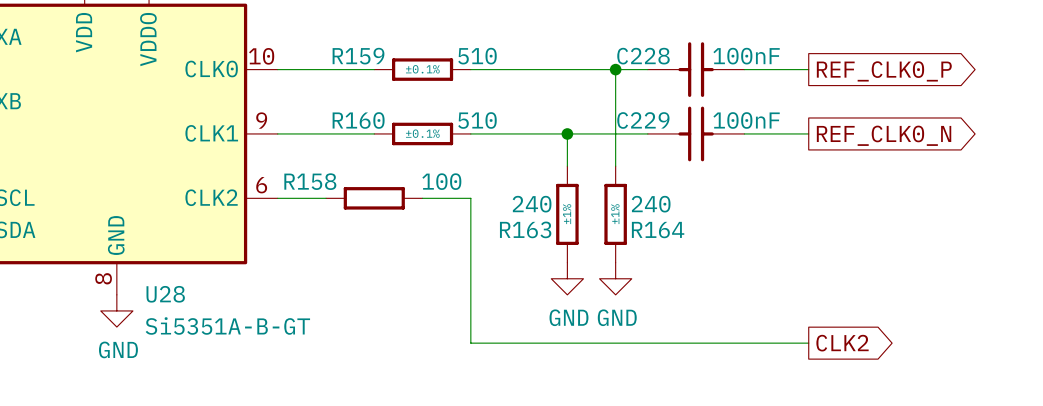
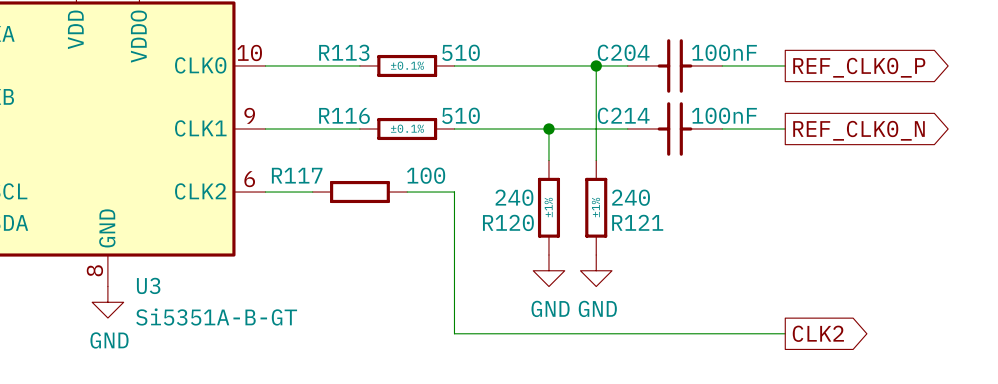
R159 name: R159 (358, 56) -> R113 (344, 52)
C228 name: C228 (643, 56) -> C204 (623, 52)
R160 name: R160 (358, 120) -> R116 (344, 115)
C229 name: C229 (643, 120) -> C214 (623, 115)
R158 name: R158 (310, 181) -> R117 (297, 175)
R163 name: R163 (525, 229) -> R120 (508, 222)
R164 name: R164 (658, 230) -> R121 (637, 222)
U28 name: U28 (165, 294) -> U3 (148, 285)

